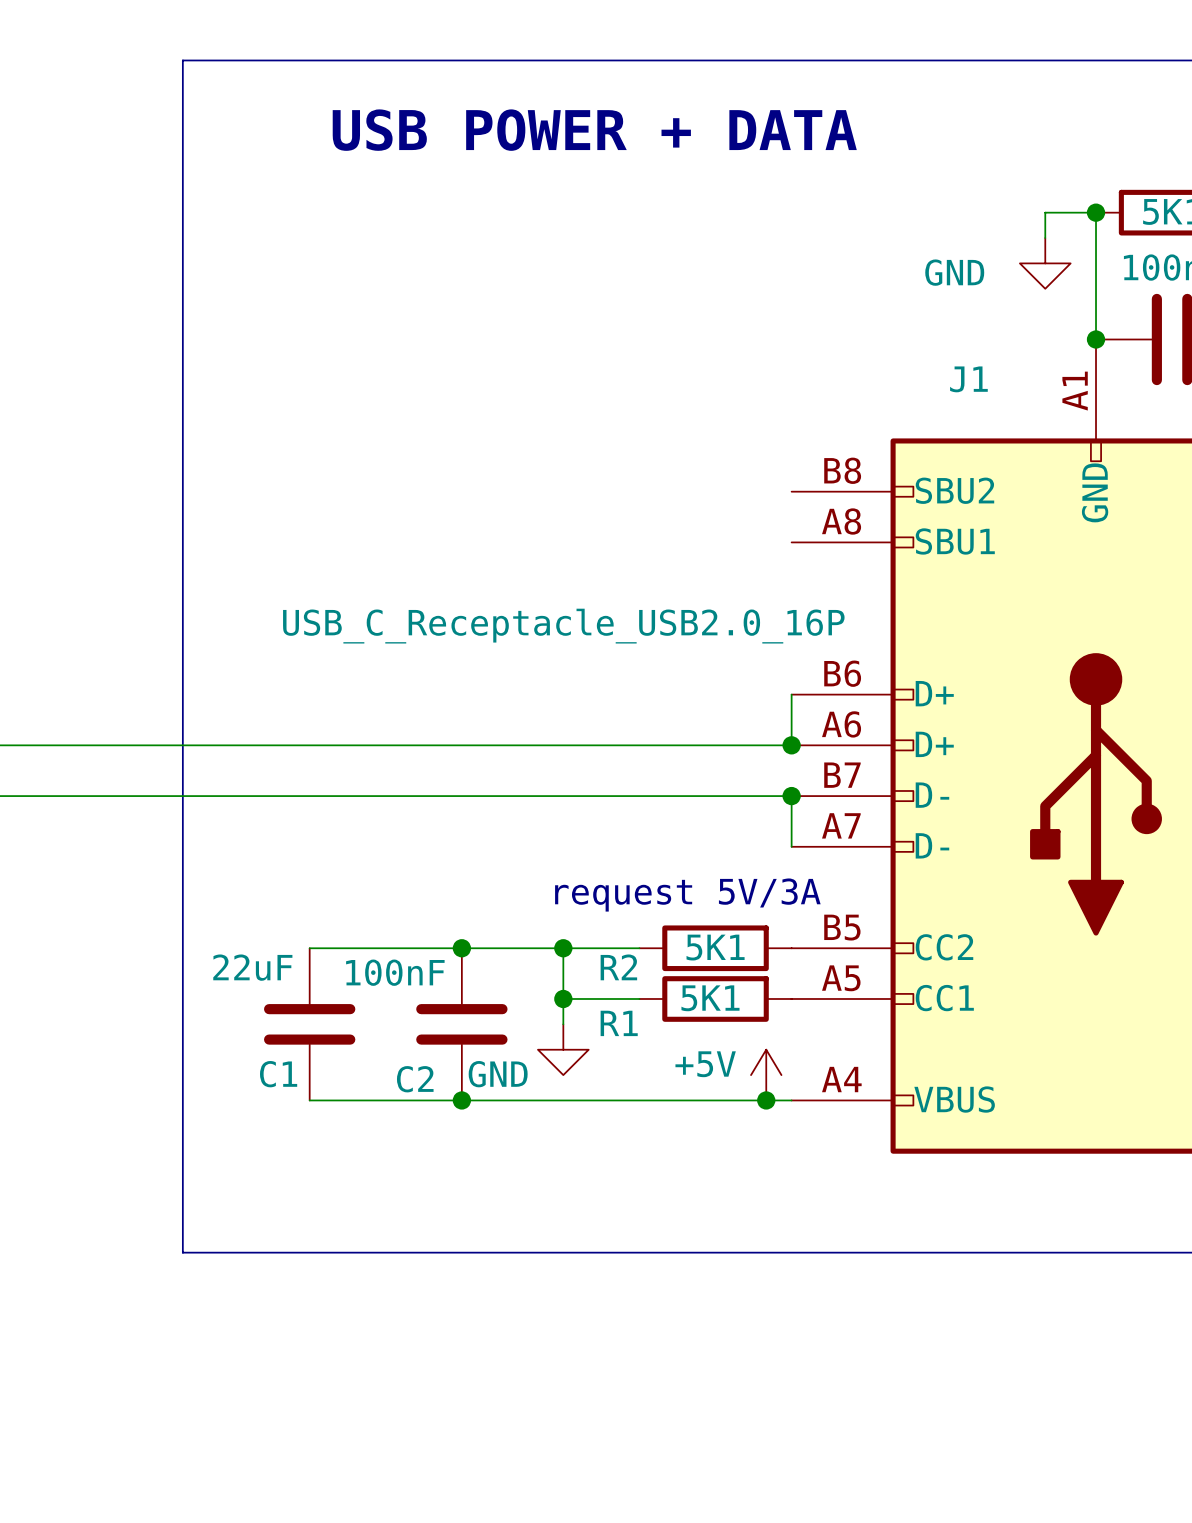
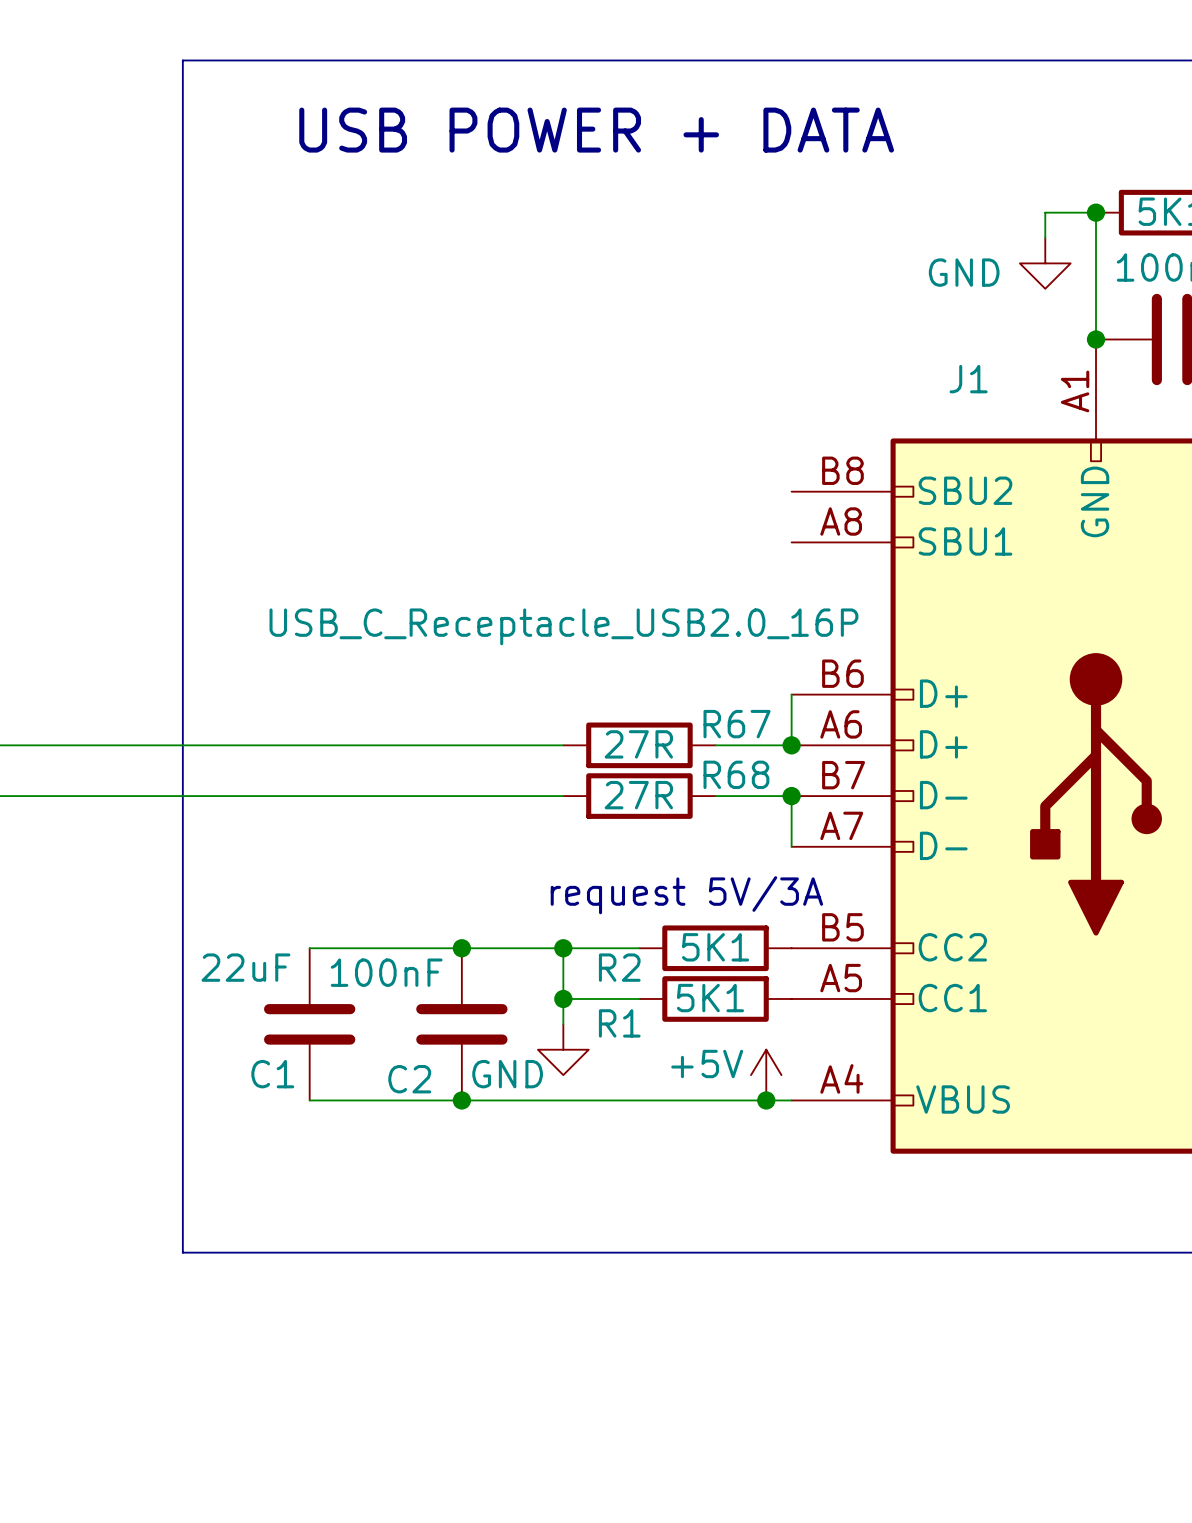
wire: (563, 745) (715, 745) -> none
R67: none -> 27R (639, 745)
wire: (563, 796) (715, 796) -> none
R68: none -> 27R (639, 796)

